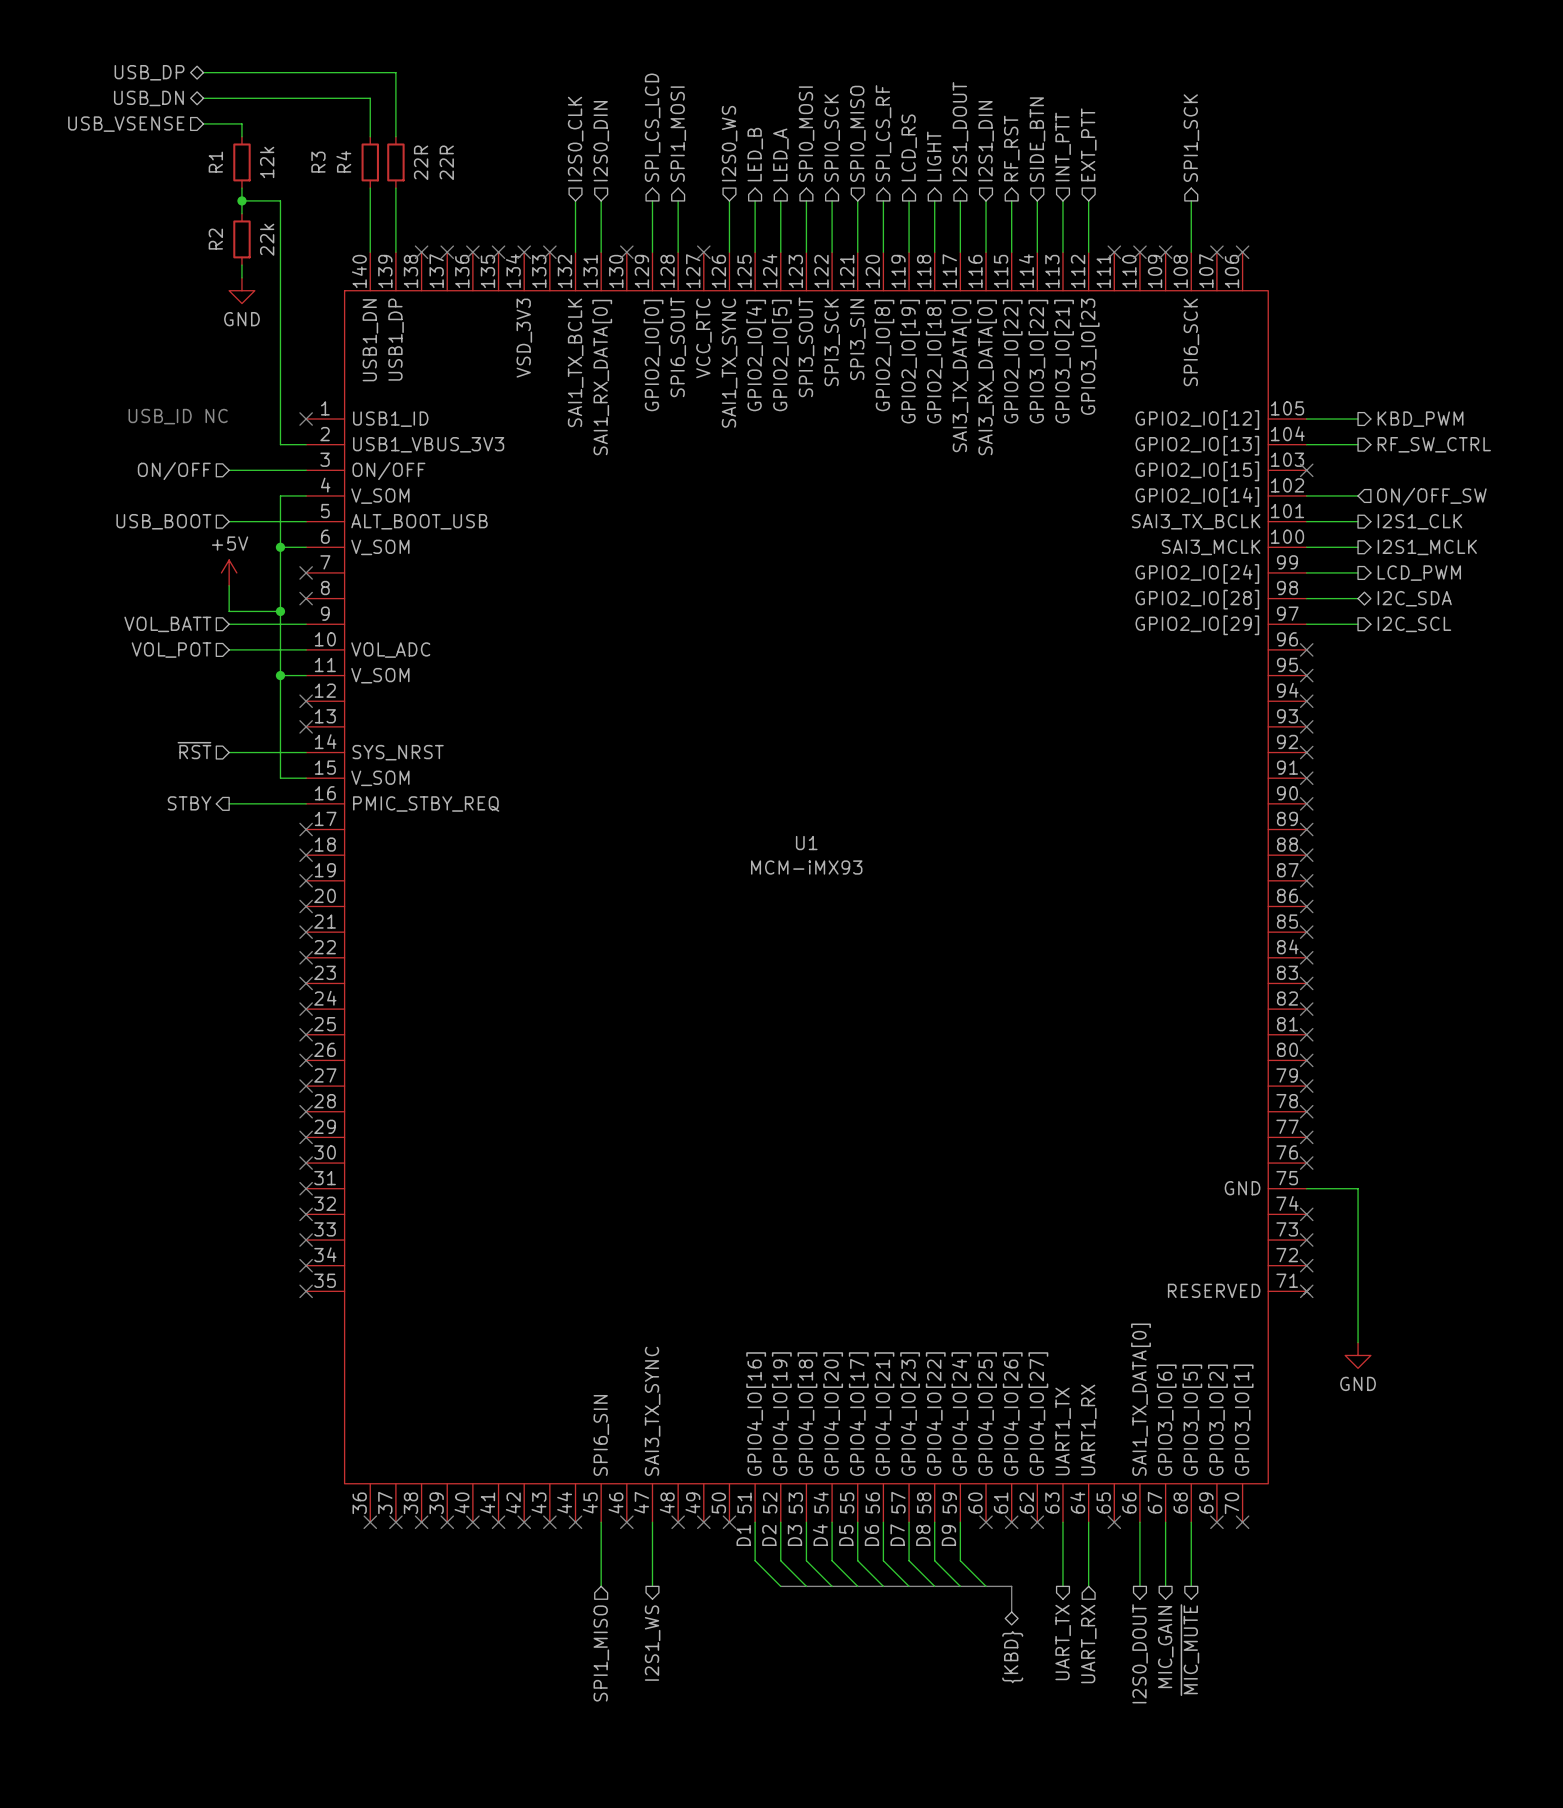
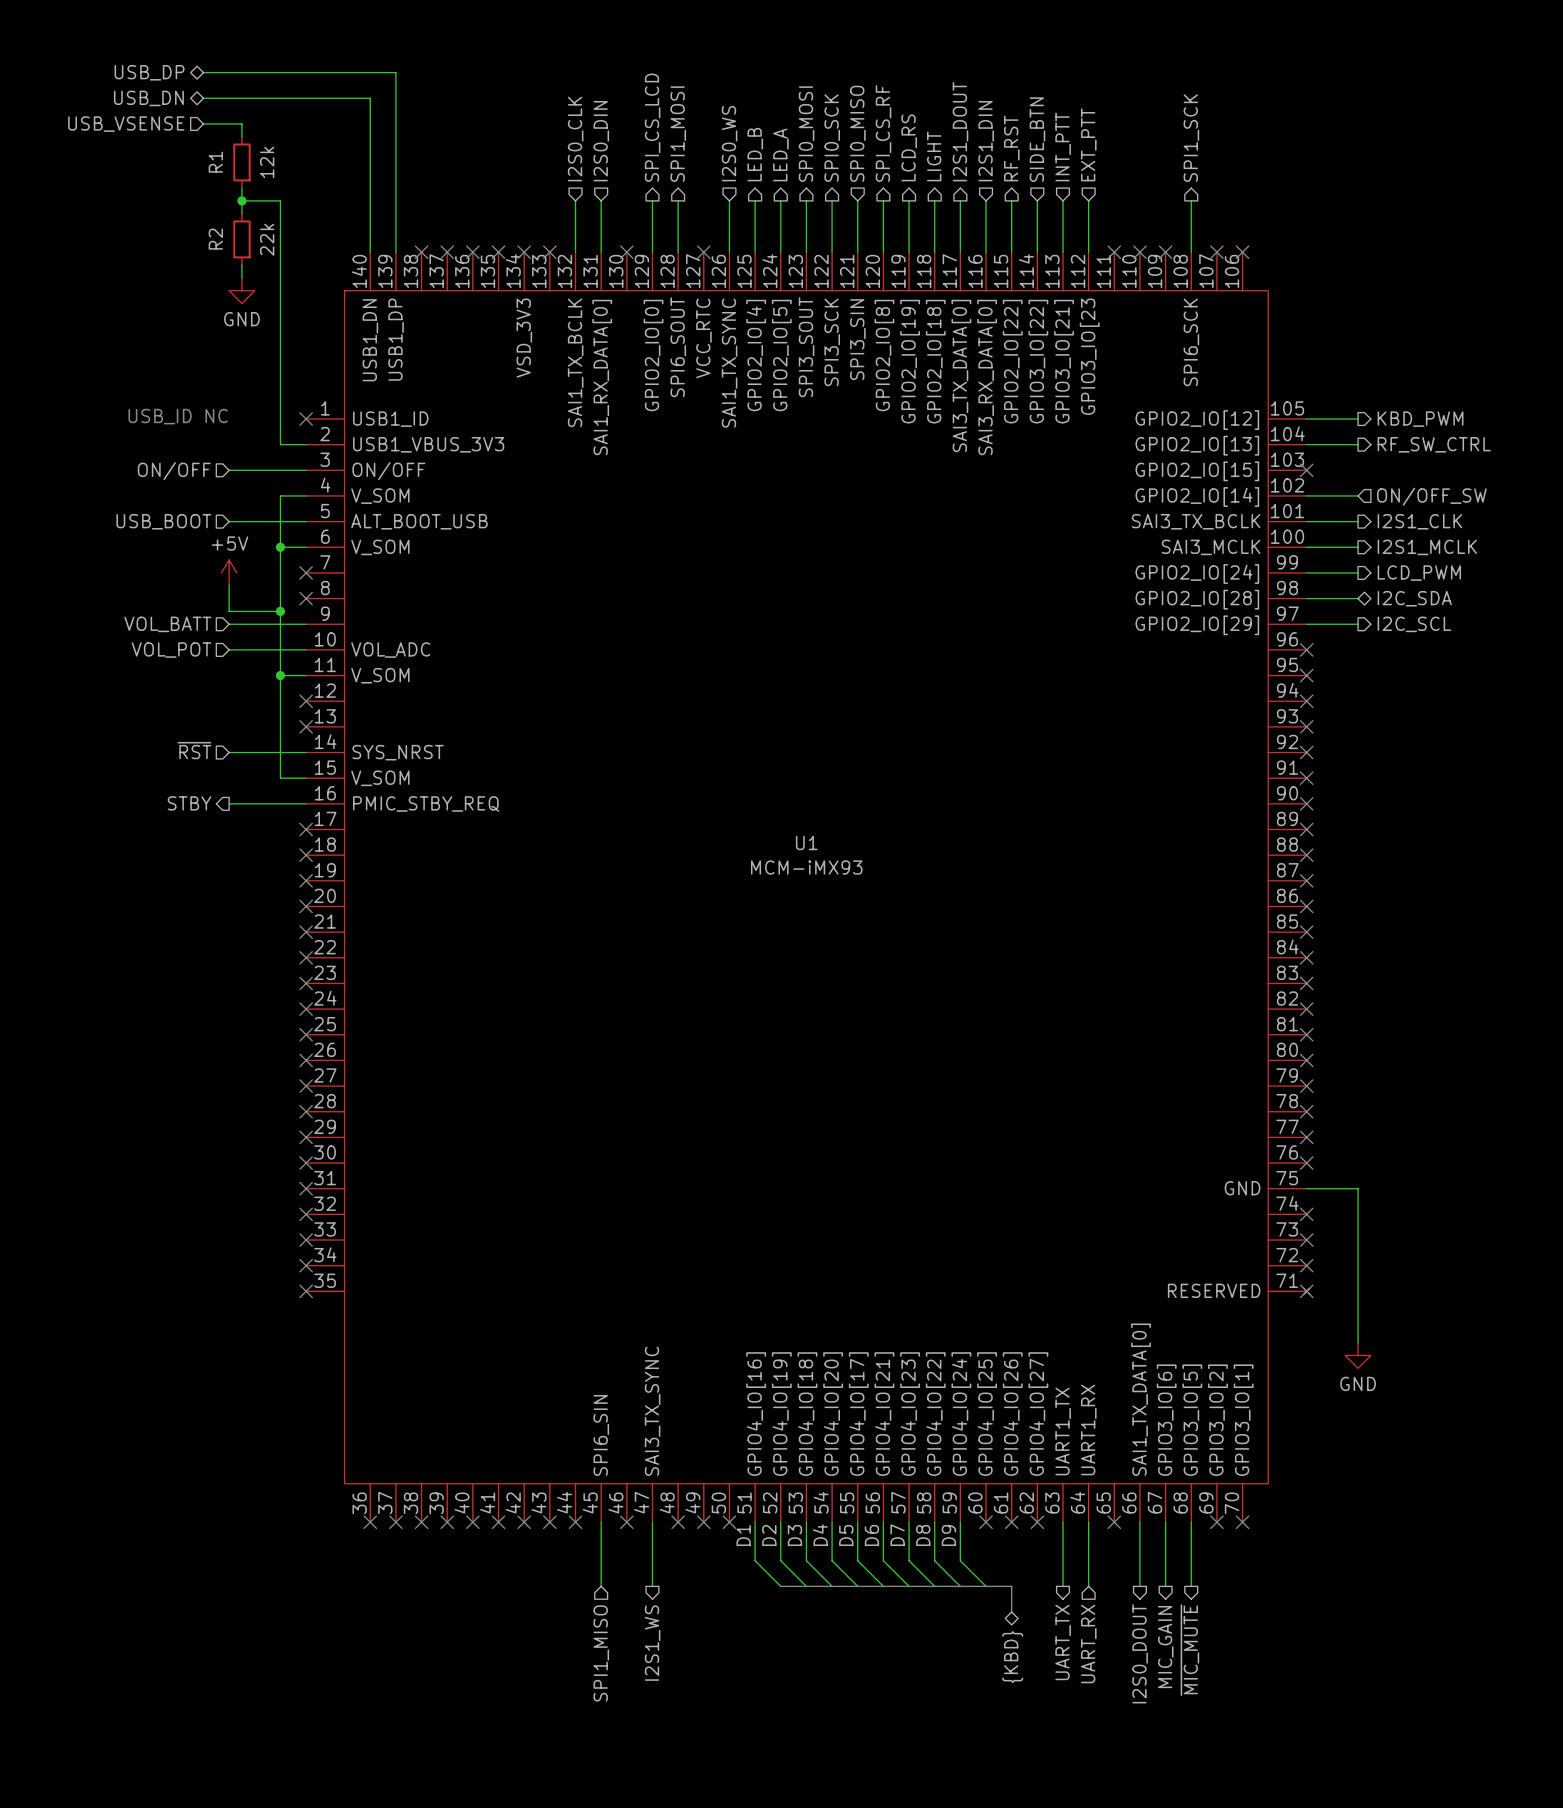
wire: none -> (370, 136) (370, 188)
wire: none -> (395, 136) (395, 188)
R3: 22R (370, 162) -> none
R4: 22R (395, 162) -> none

